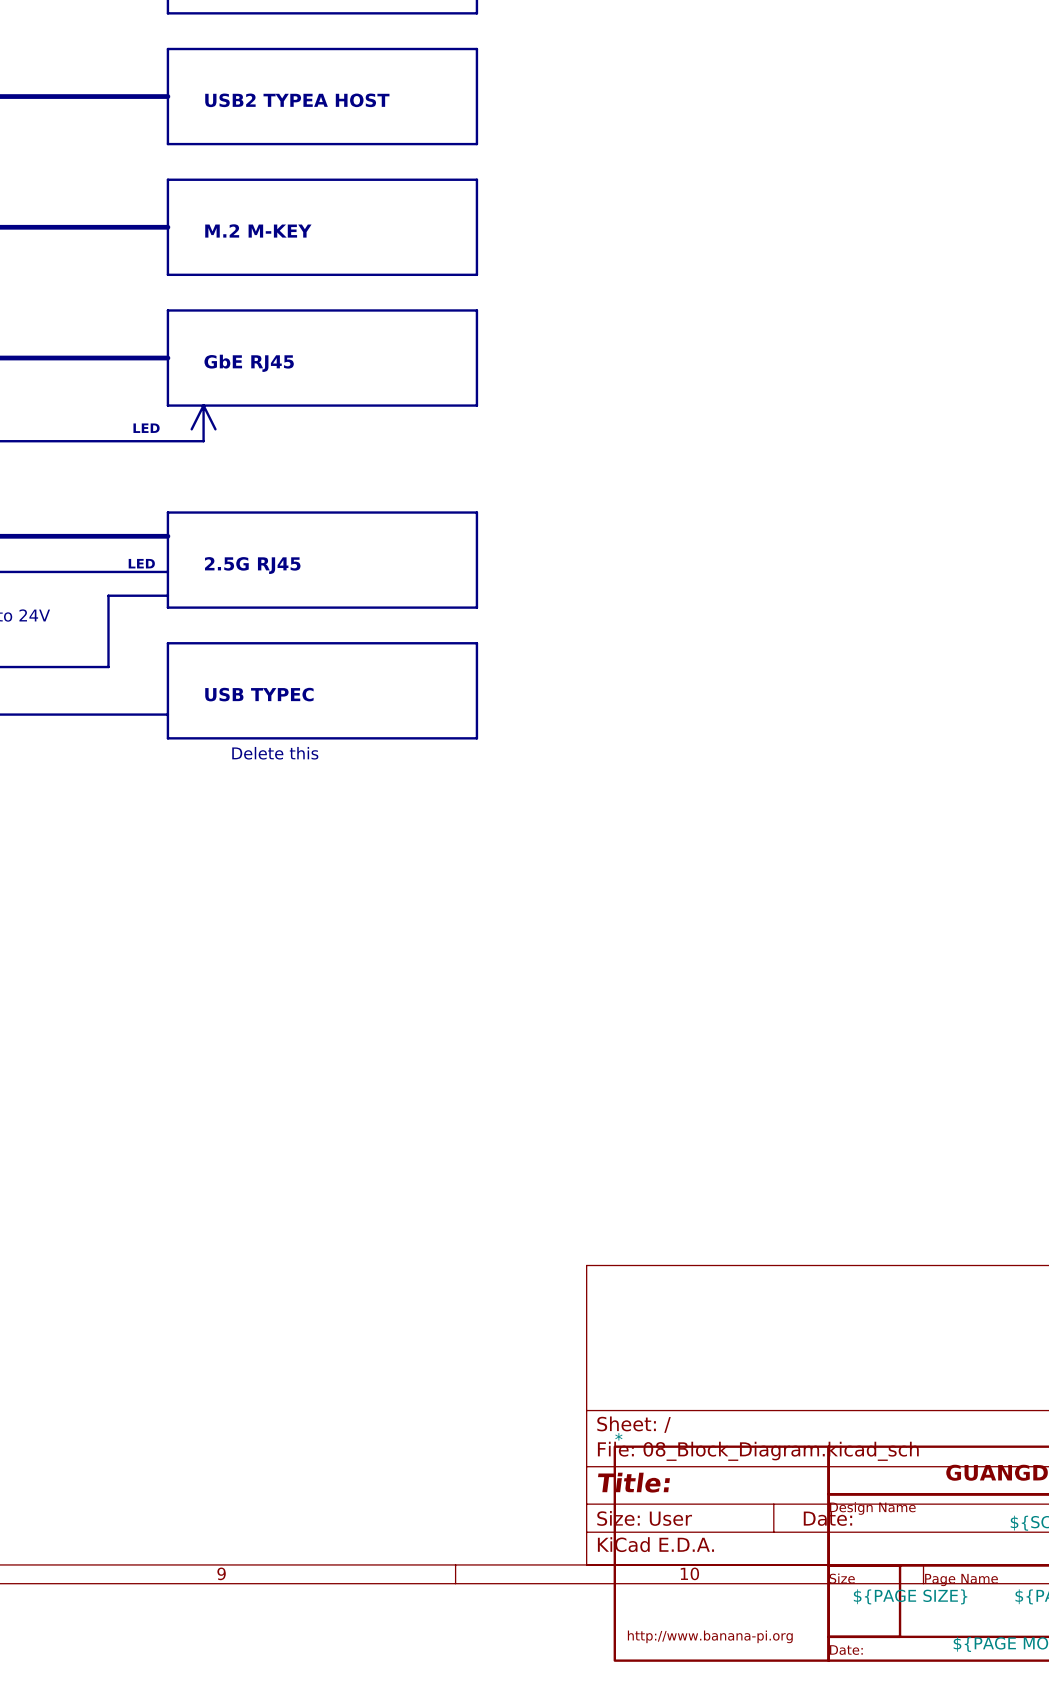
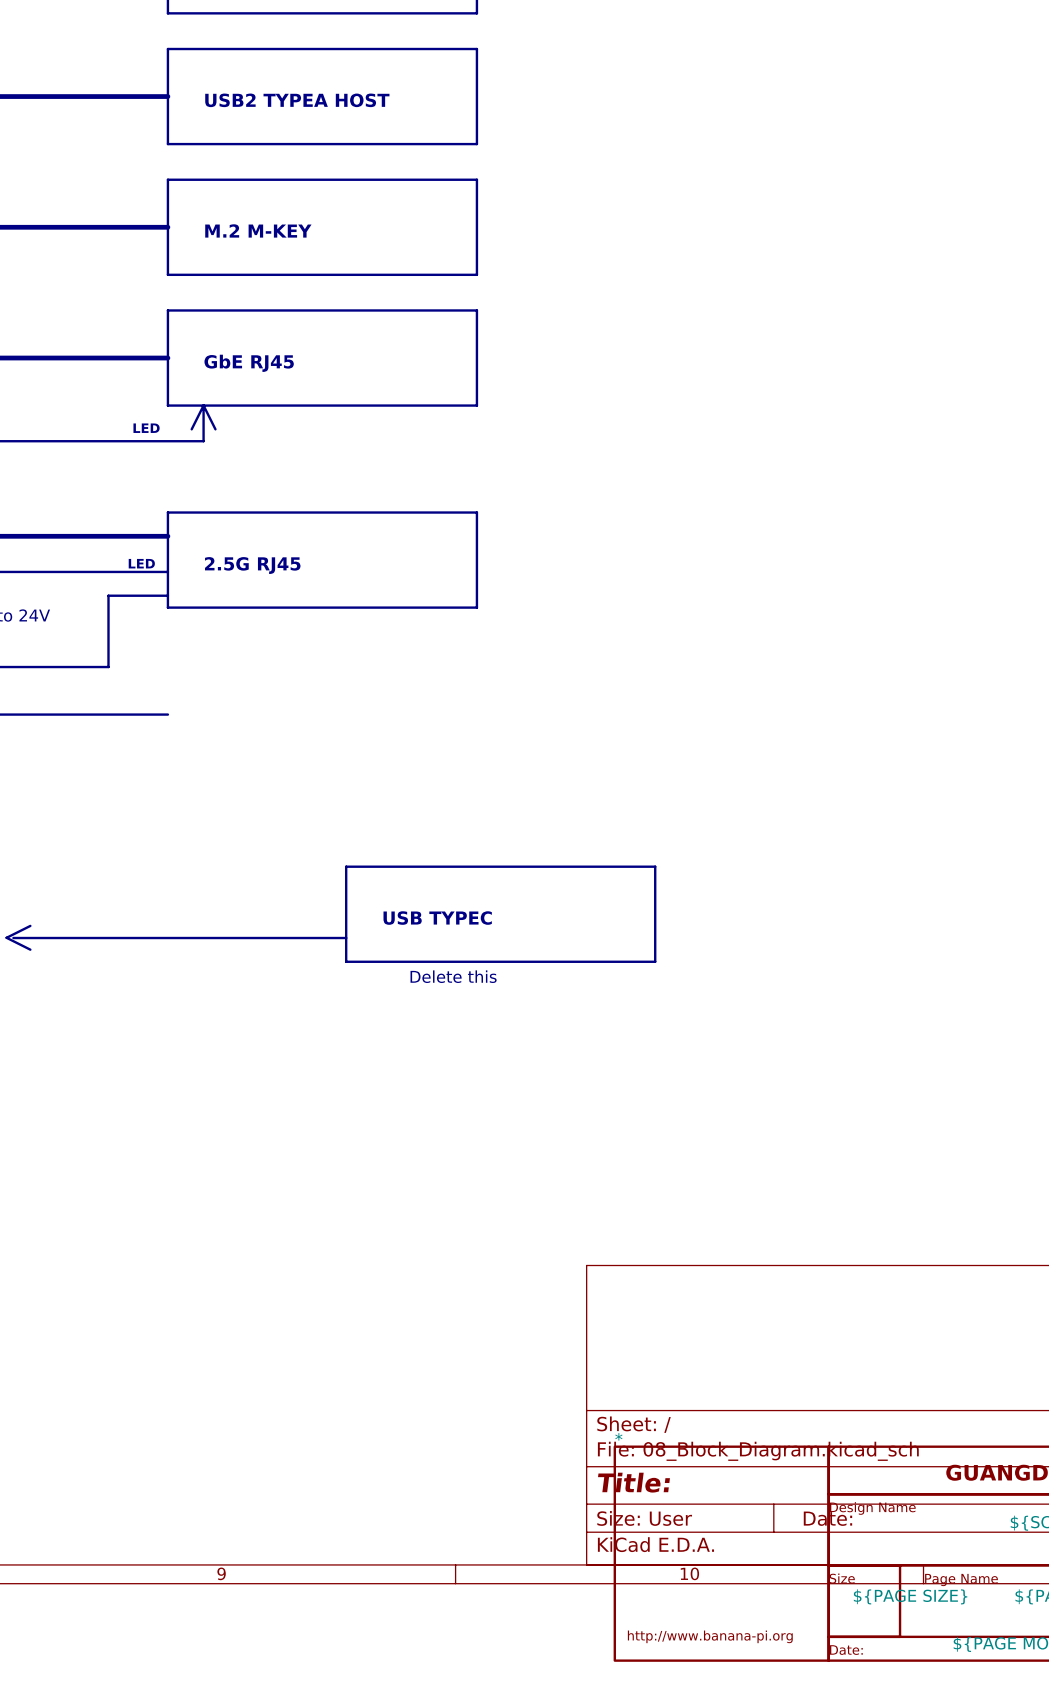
line: (167, 643) (476, 643) (476, 738) (167, 738) (167, 643) -> none
text: USB TYPEC (259, 694) -> none
text: Delete this (275, 753) -> none
line: none -> (346, 866) (655, 866) (655, 961) (346, 961) (346, 866)
text: none -> USB TYPEC (437, 918)
line: none -> (30, 925) (6, 937) (30, 949)
line: none -> (13, 938) (346, 938)
text: none -> Delete this (453, 976)

